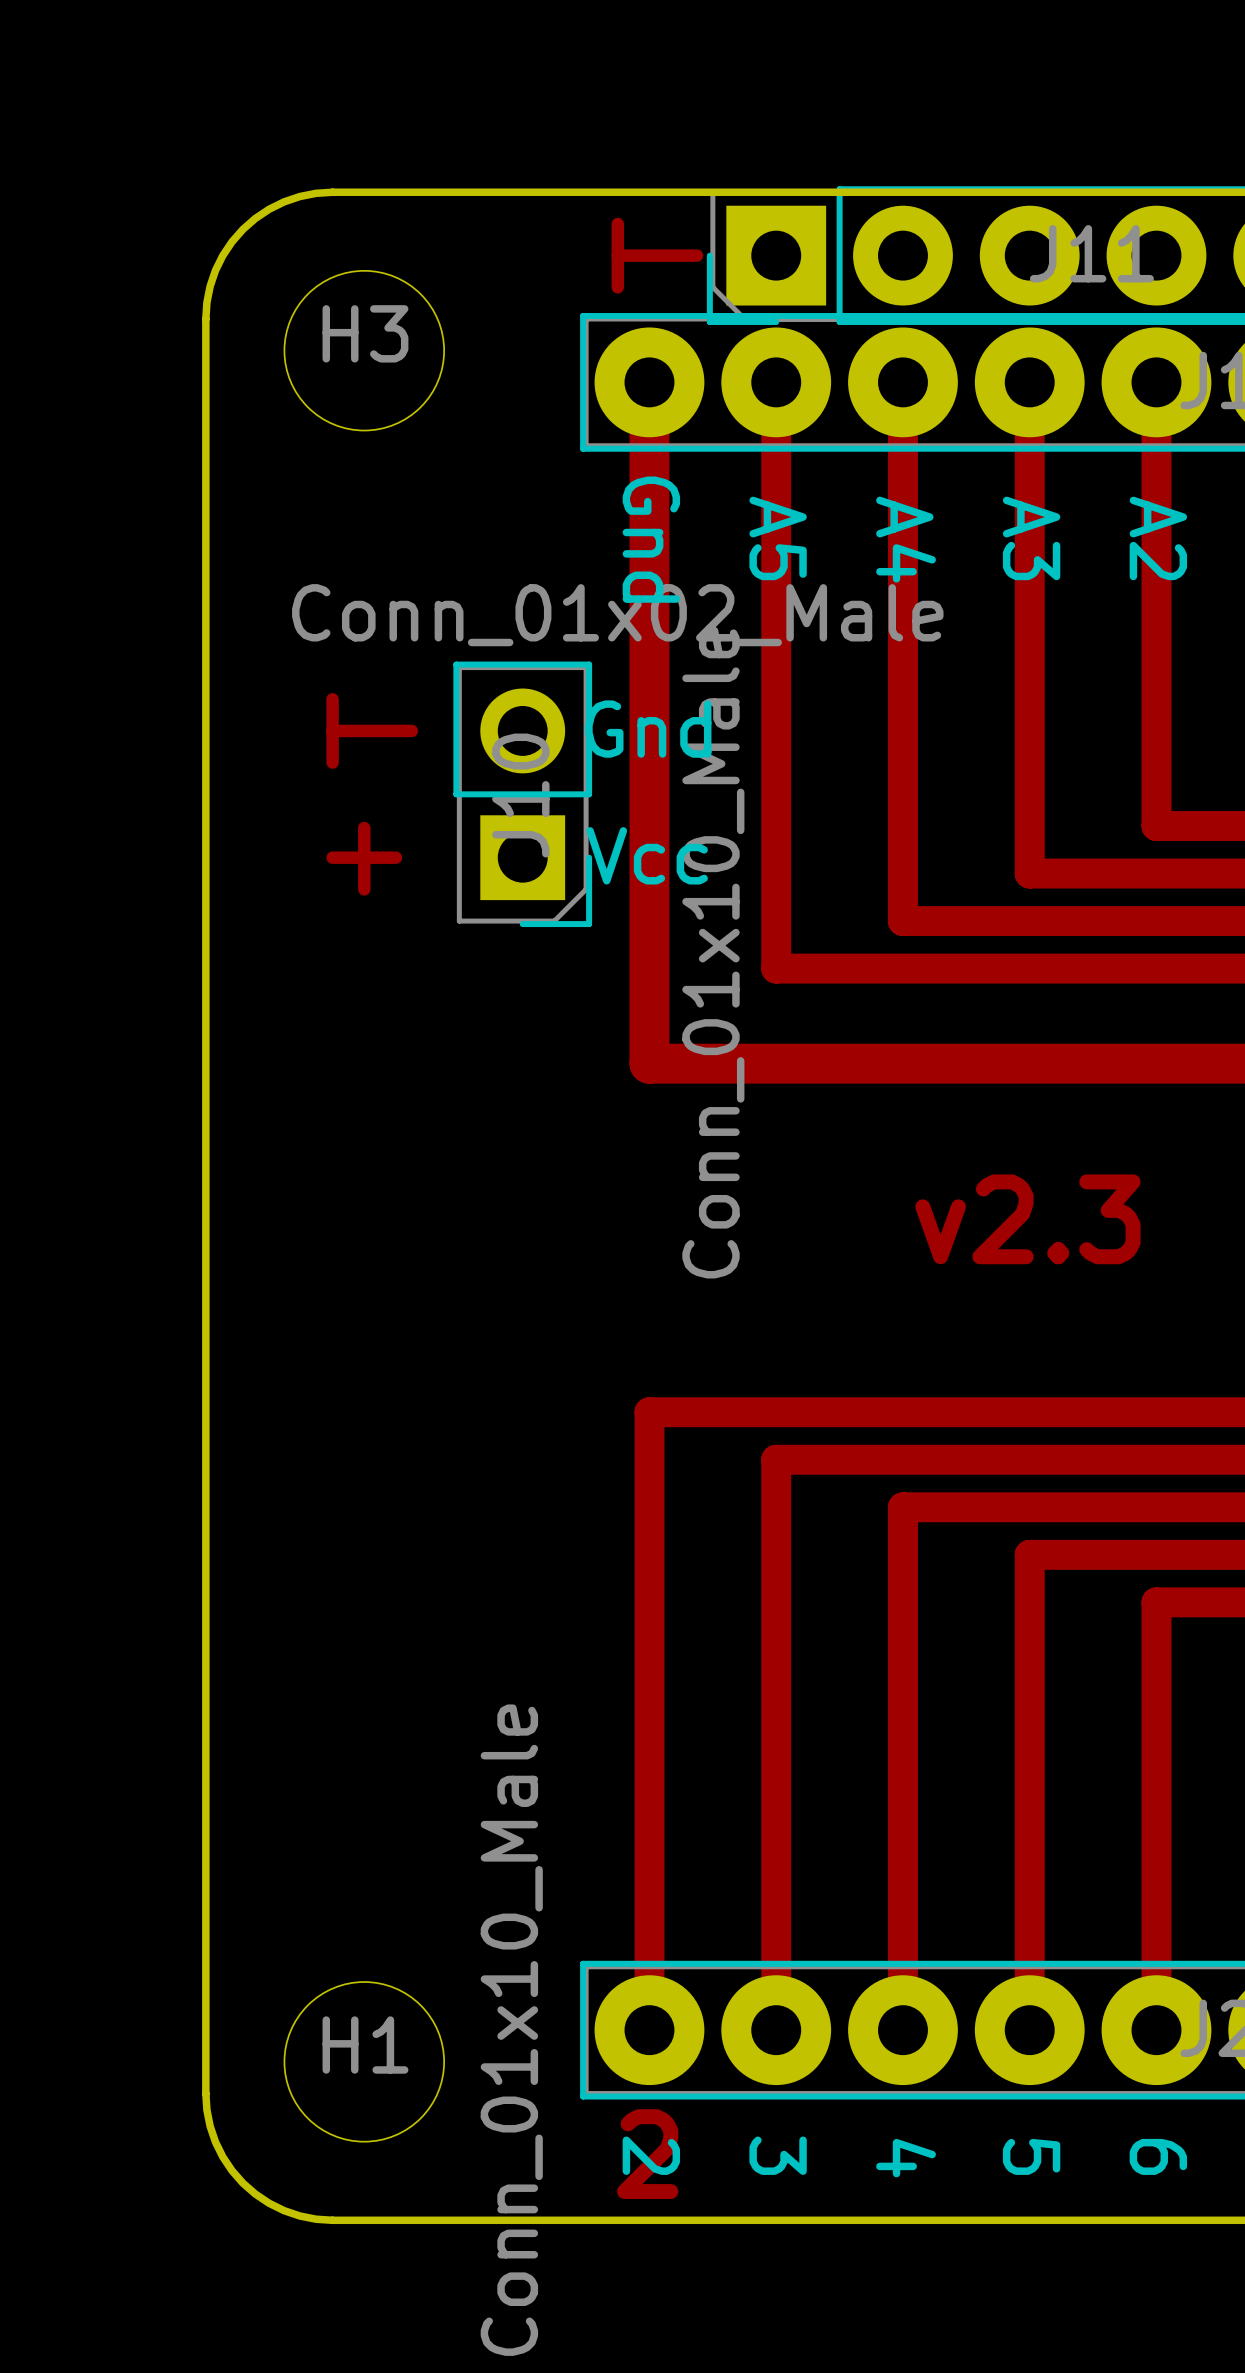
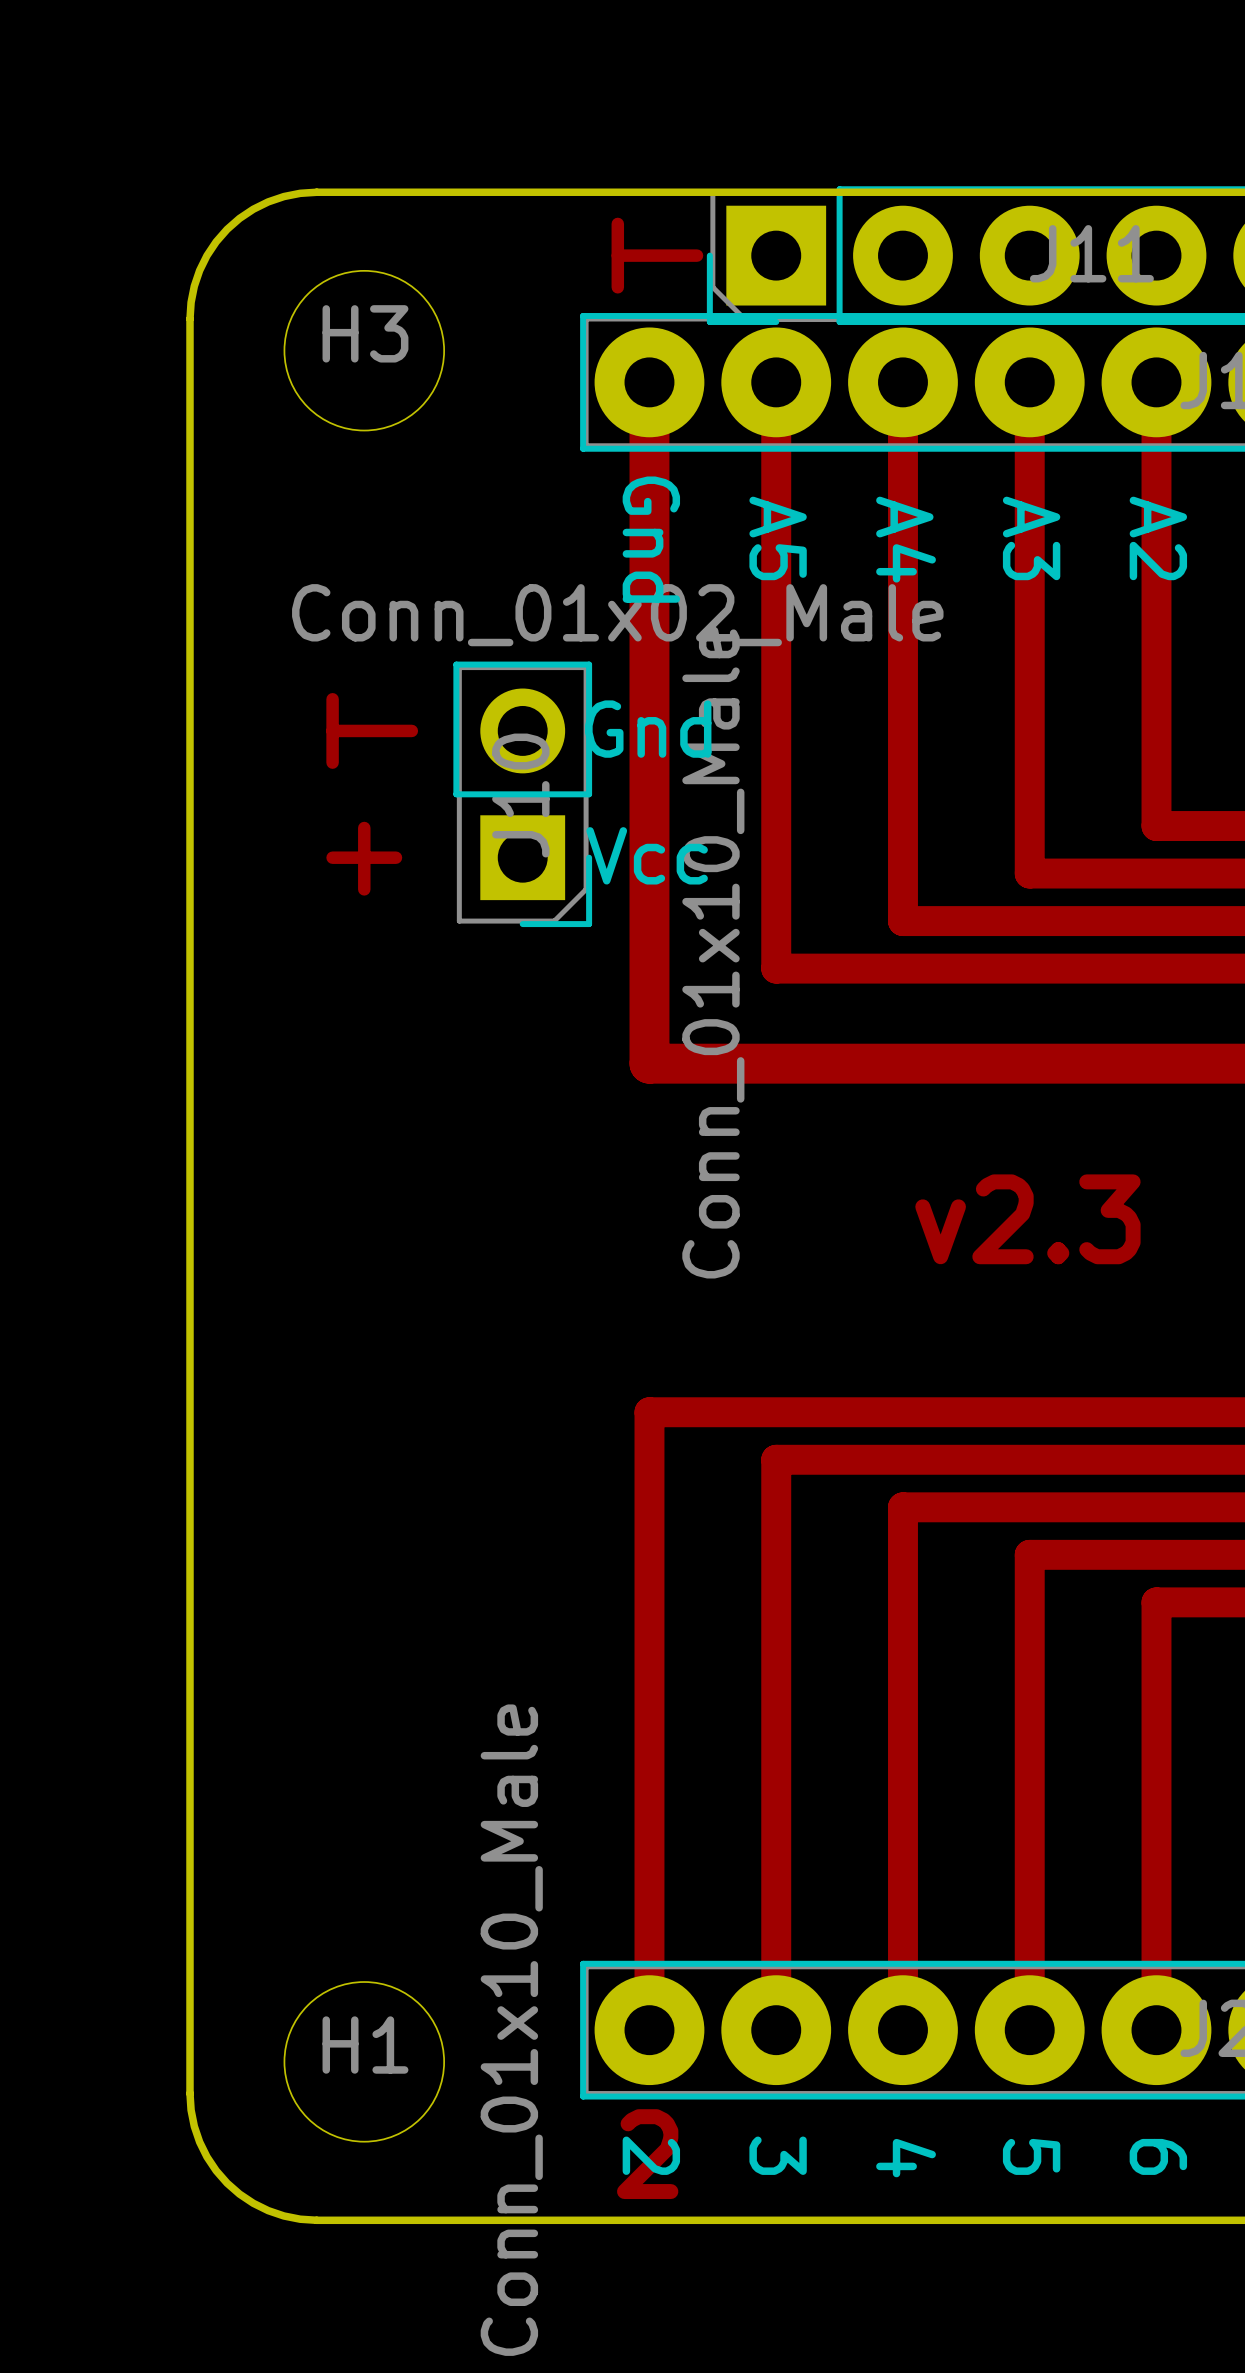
board edge: (332, 192) (316, 193) (284, 201) (255, 218) (242, 229) (232, 241) (215, 270) (206, 302) (205, 318) (206, 2110) (215, 2142) (222, 2156) (232, 2170) (255, 2194) (284, 2210) (316, 2219) (332, 2220) -> (332, 192) (300, 193) (268, 201) (239, 218) (227, 229) (216, 241) (199, 270) (191, 302) (190, 318) (191, 2110) (199, 2142) (206, 2156) (216, 2170) (239, 2194) (253, 2203) (283, 2215) (300, 2219) (332, 2220)

